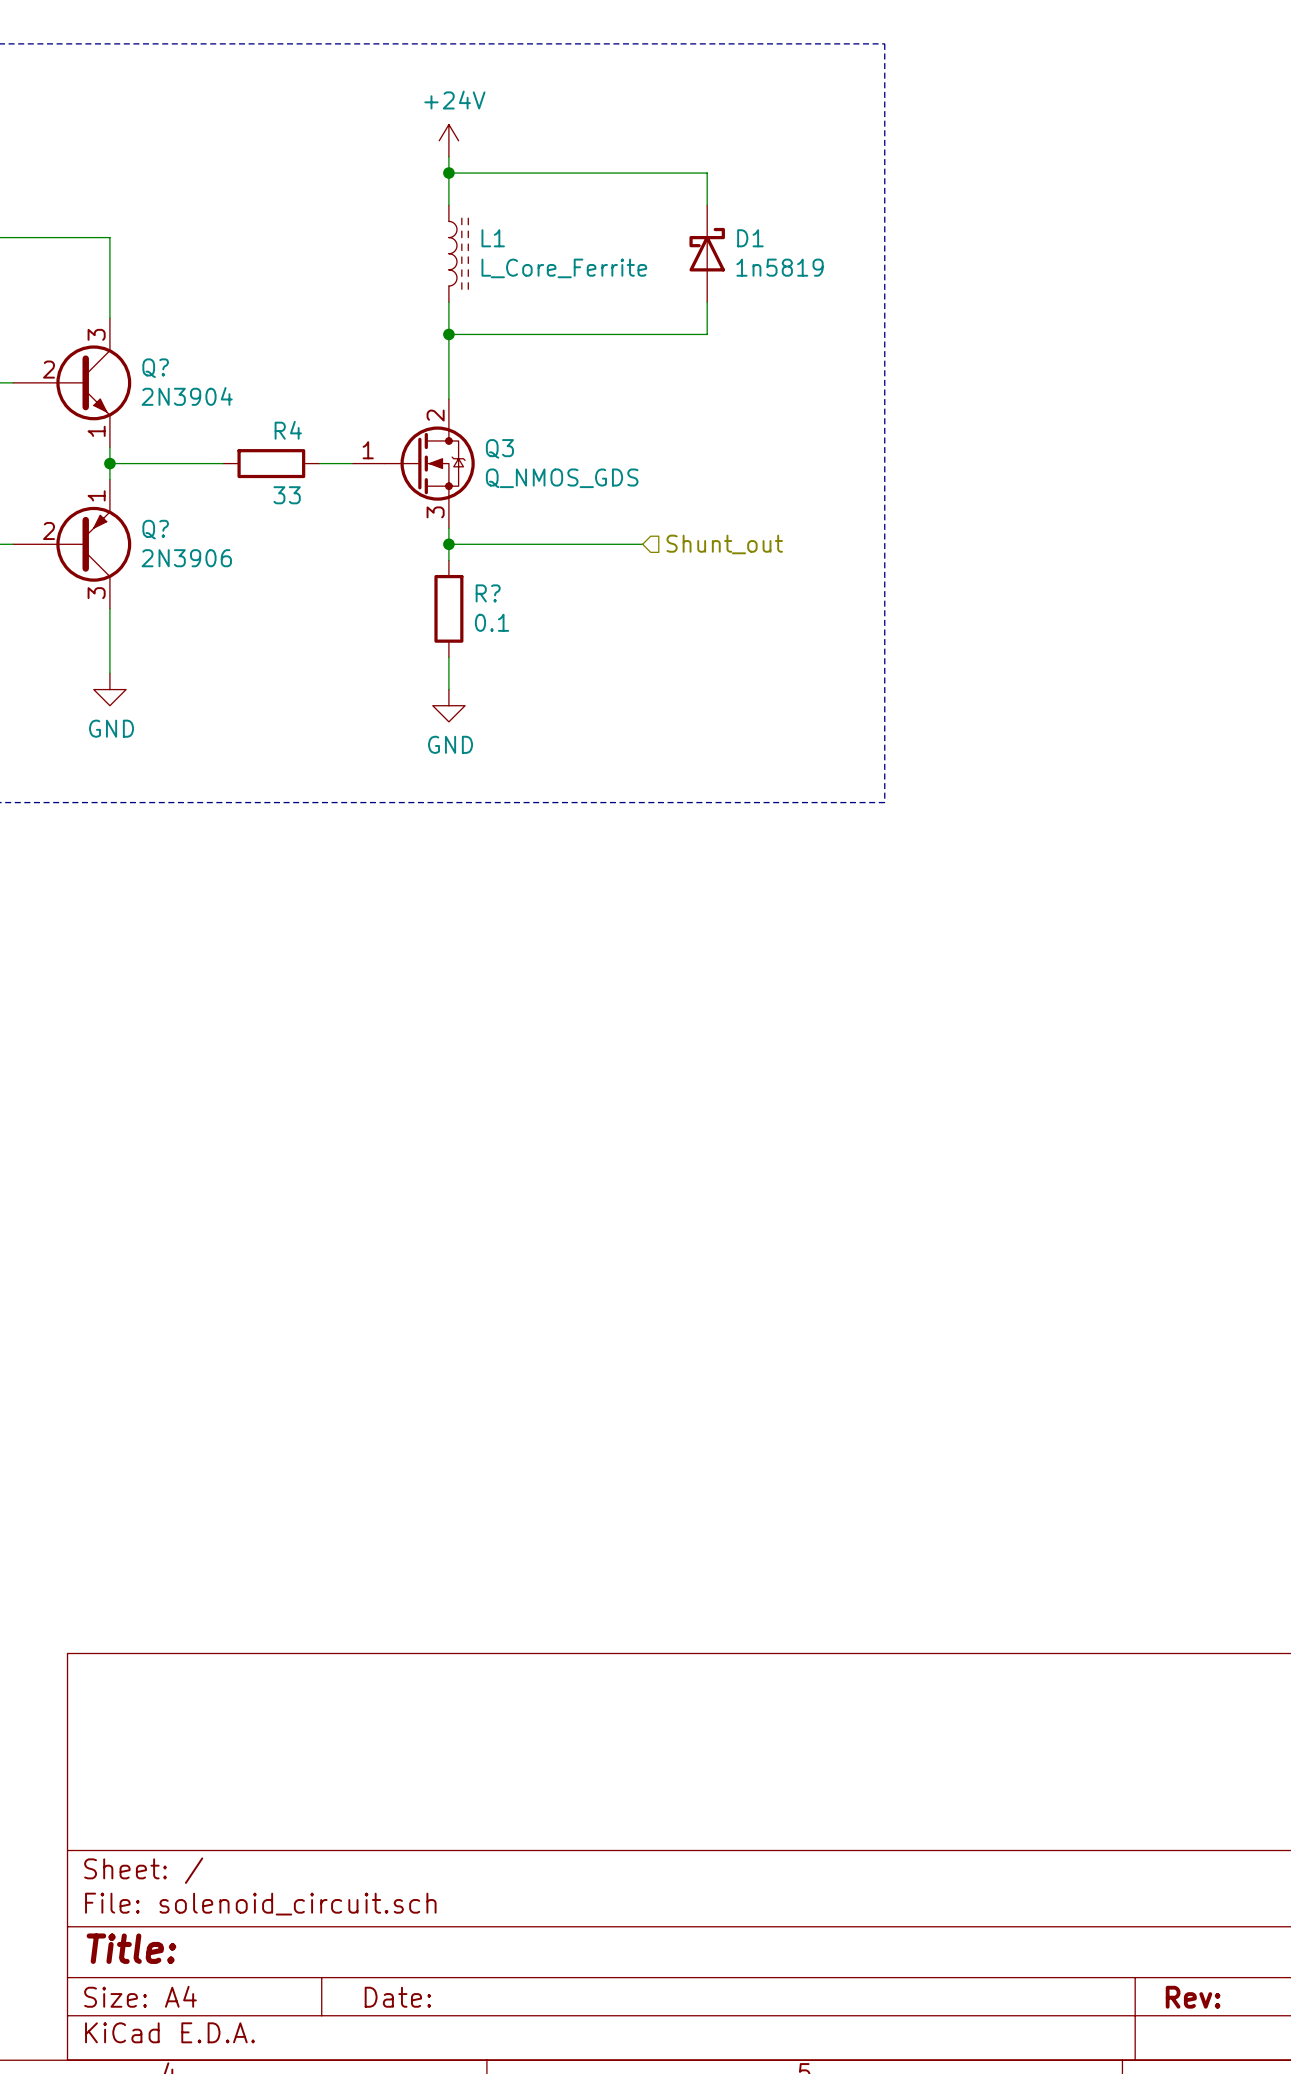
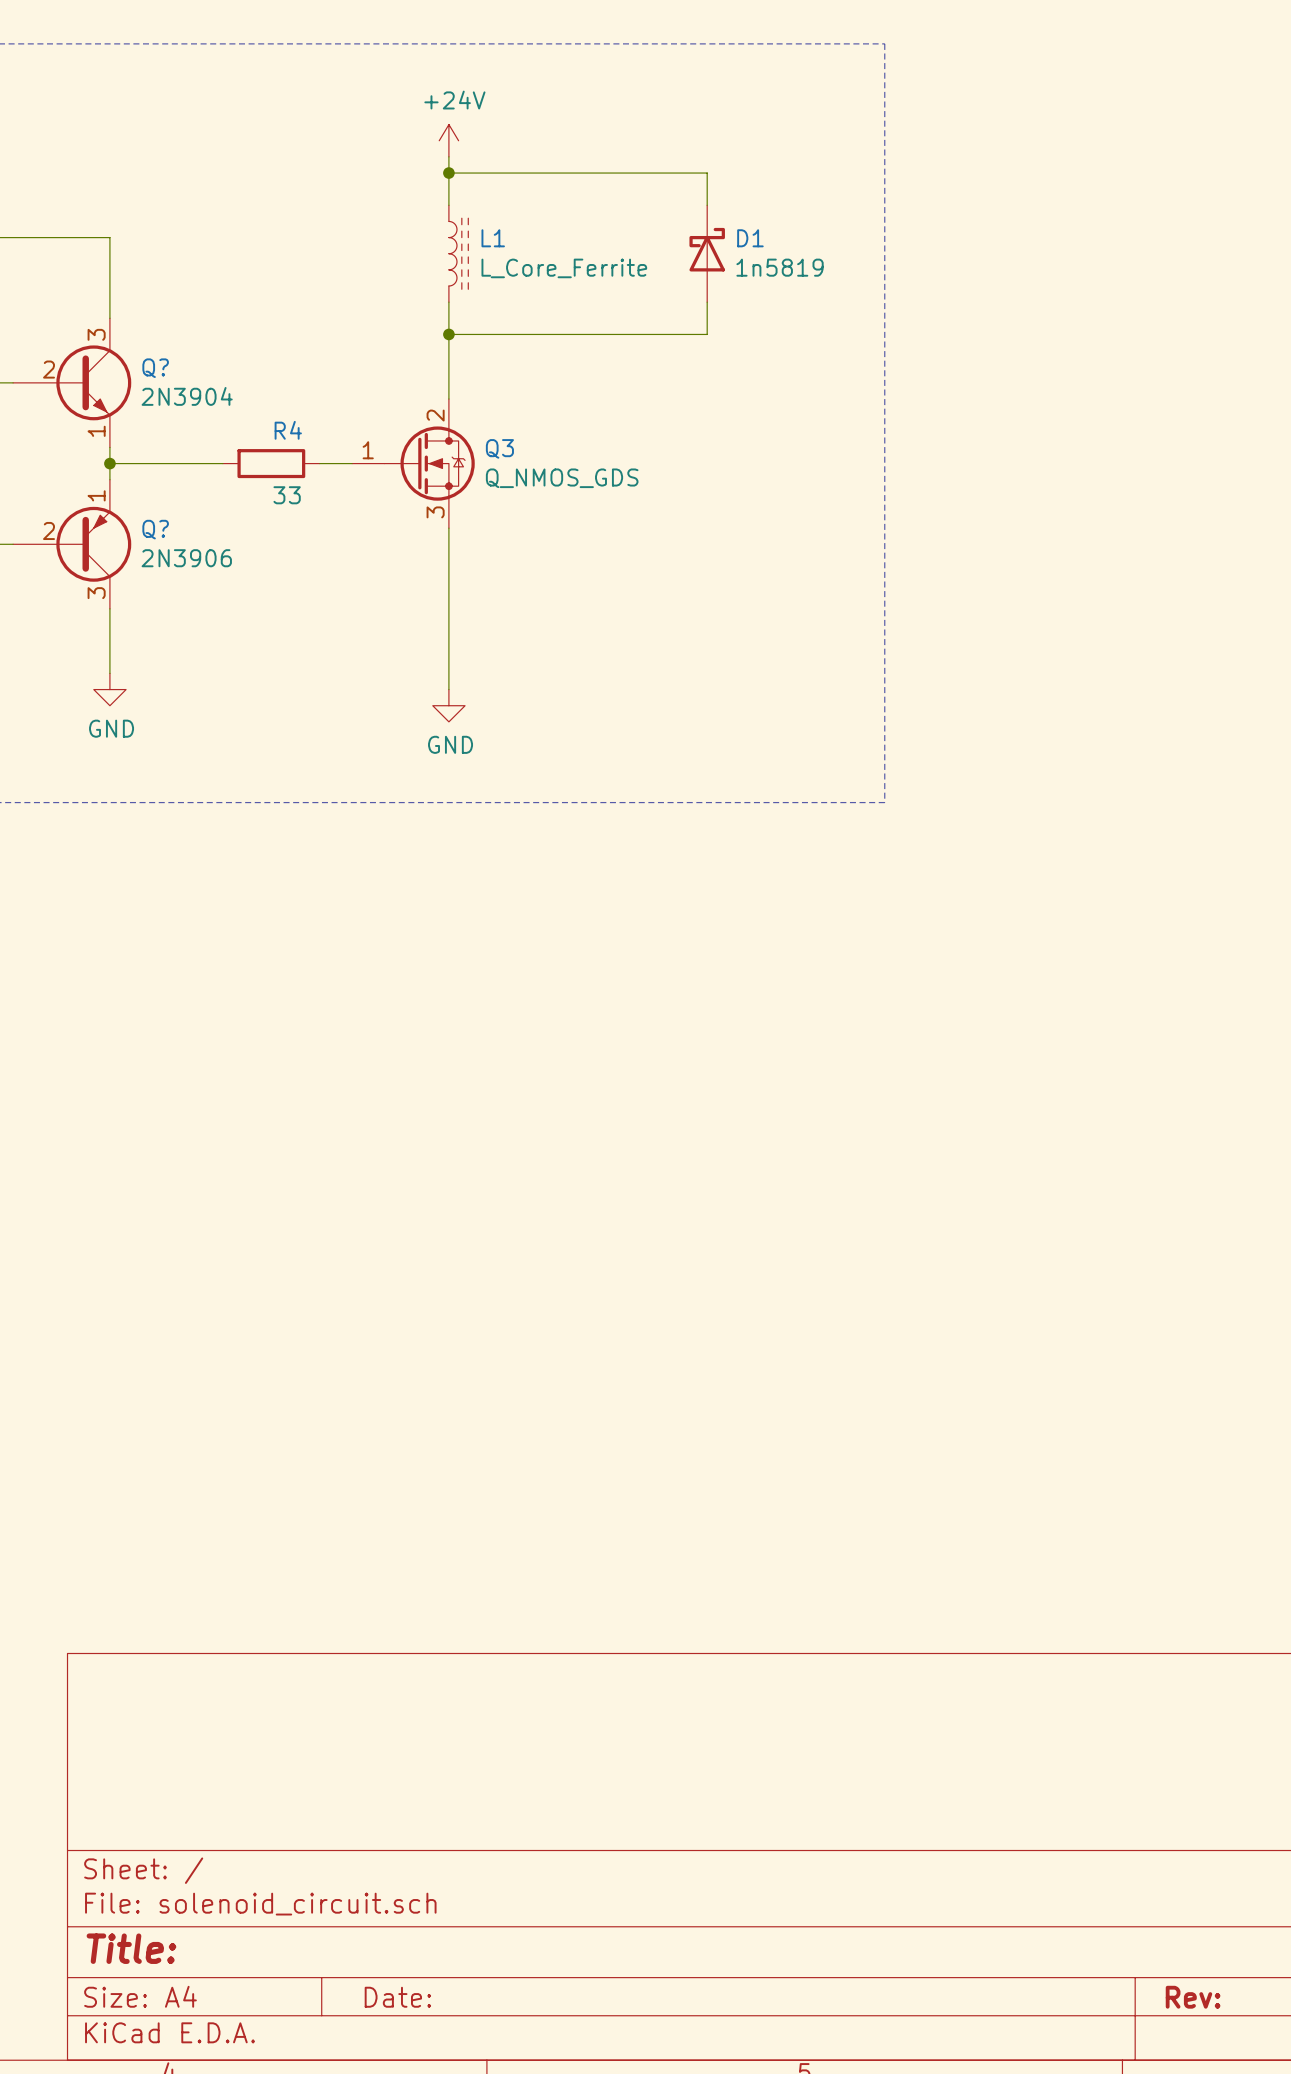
wire: (448, 544) (642, 544) -> none
junction: (448, 544) -> none
hierarchical label: Shunt_out (724, 544) -> none
wire: none -> (448, 560) (448, 657)
R?: 0.1 (448, 608) -> none

